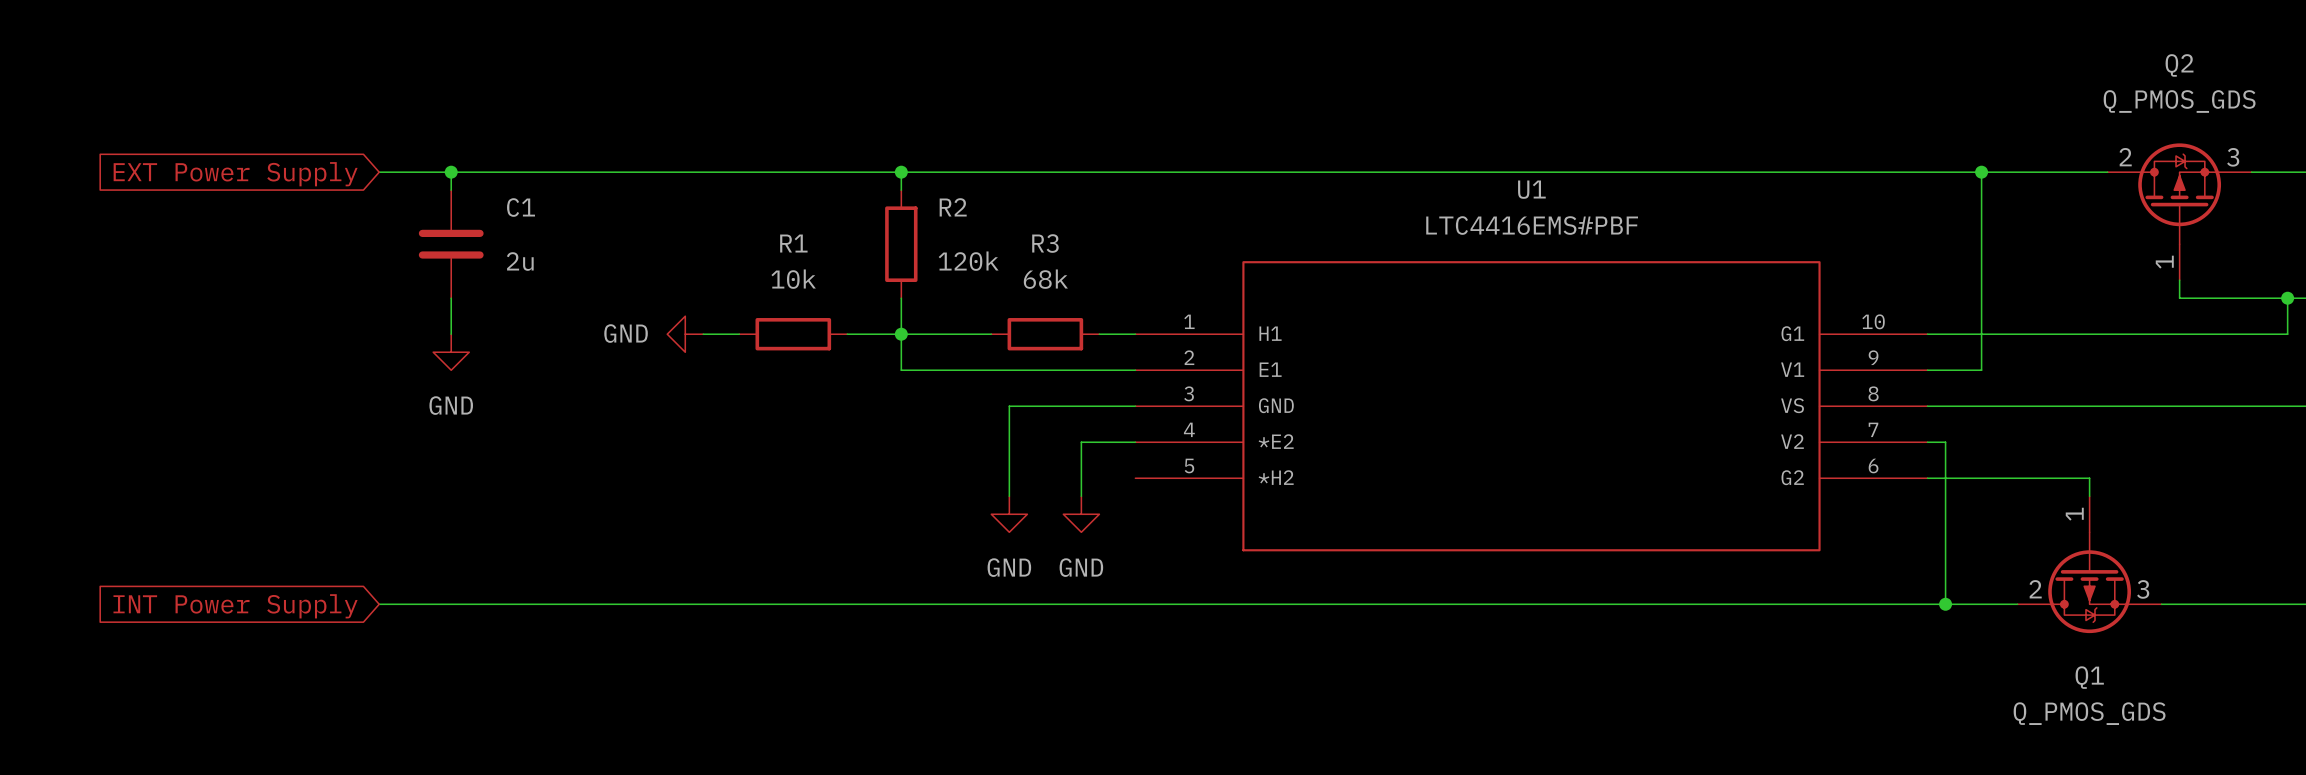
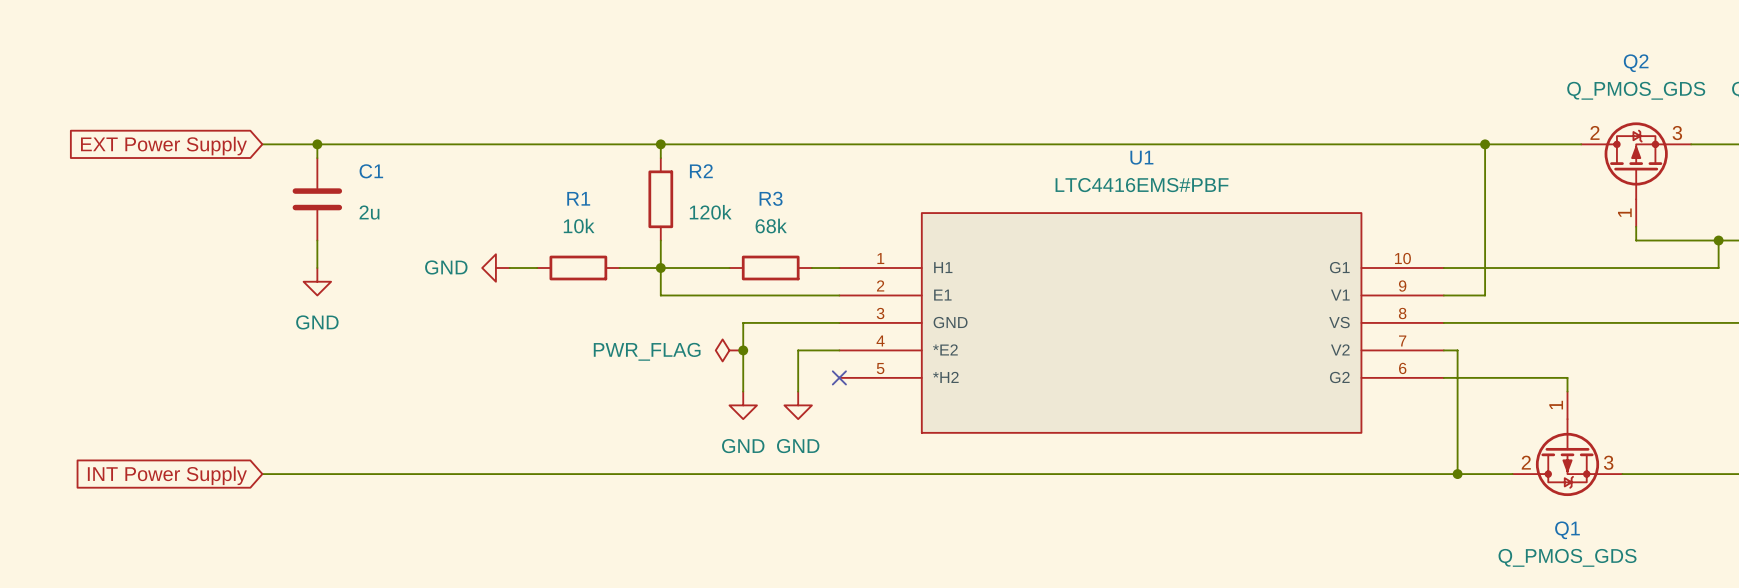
power symbol: none -> PWR_FLAG (729, 350)
junction: none -> (743, 350)
no-connect mark: none -> (839, 377)

